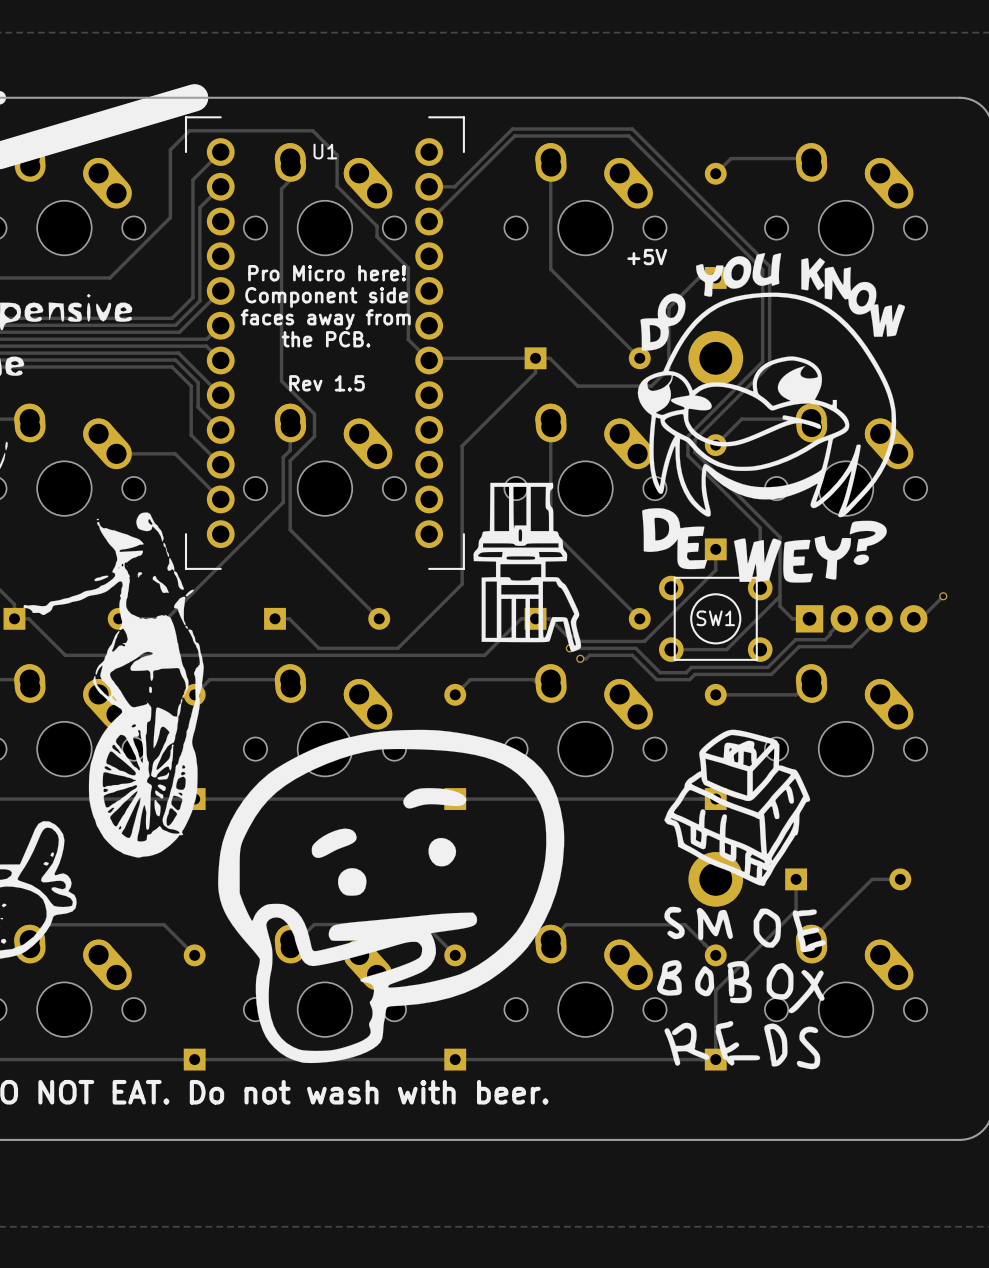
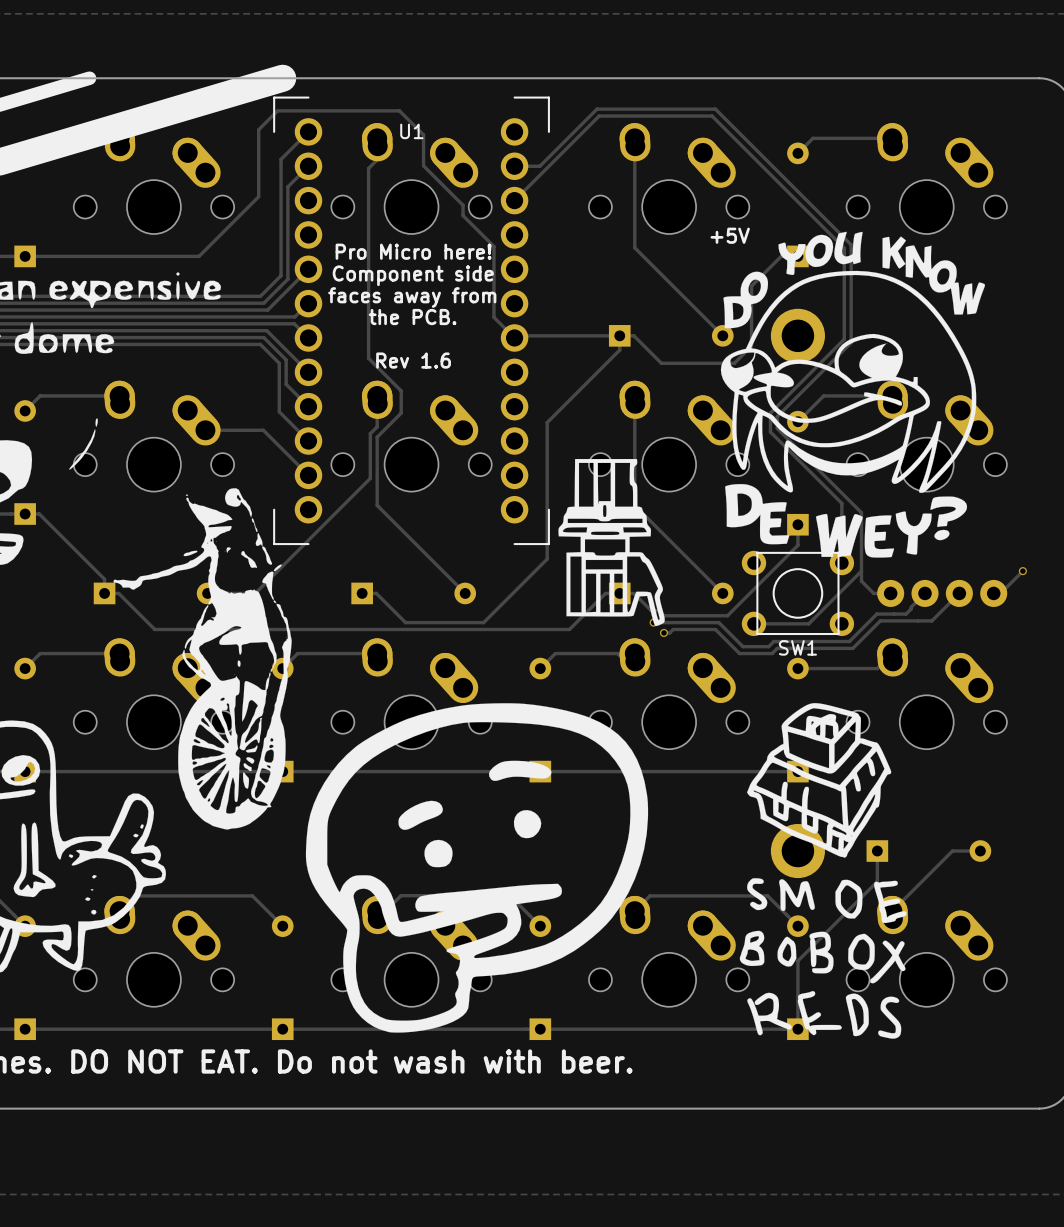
text: Rev 1.5 (327, 383) -> Rev 1.6 (413, 360)
part footprint: [795, 605, 824, 633] -> [877, 579, 905, 607]
SW1 name position: SW1 (715, 618) -> SW1 (797, 647)

